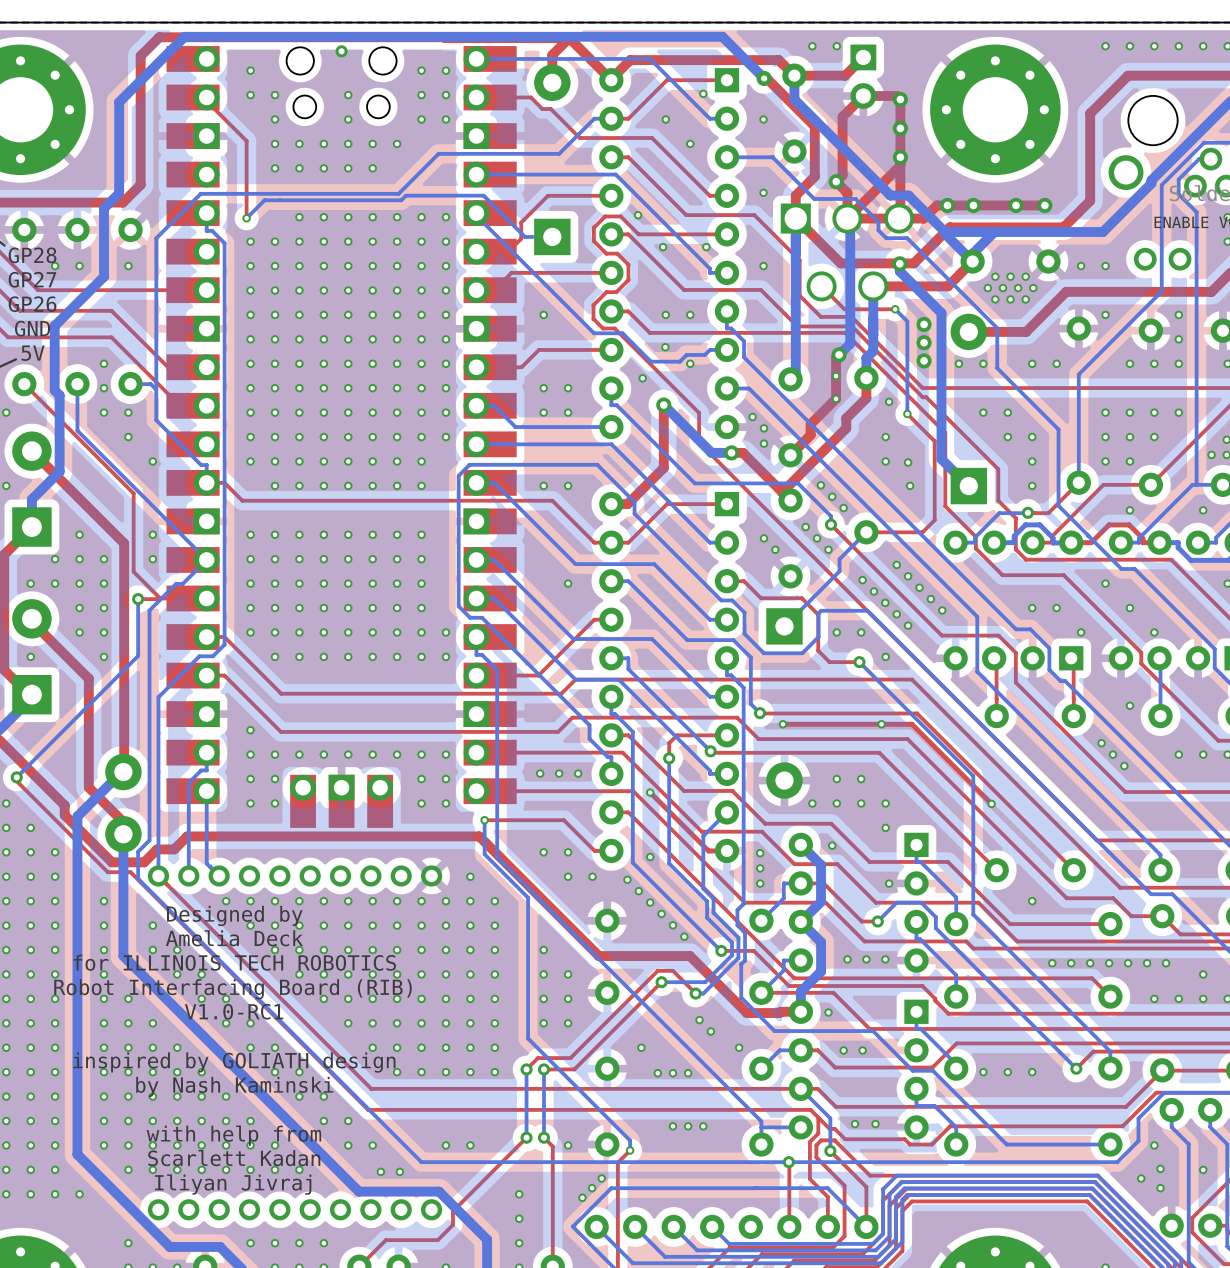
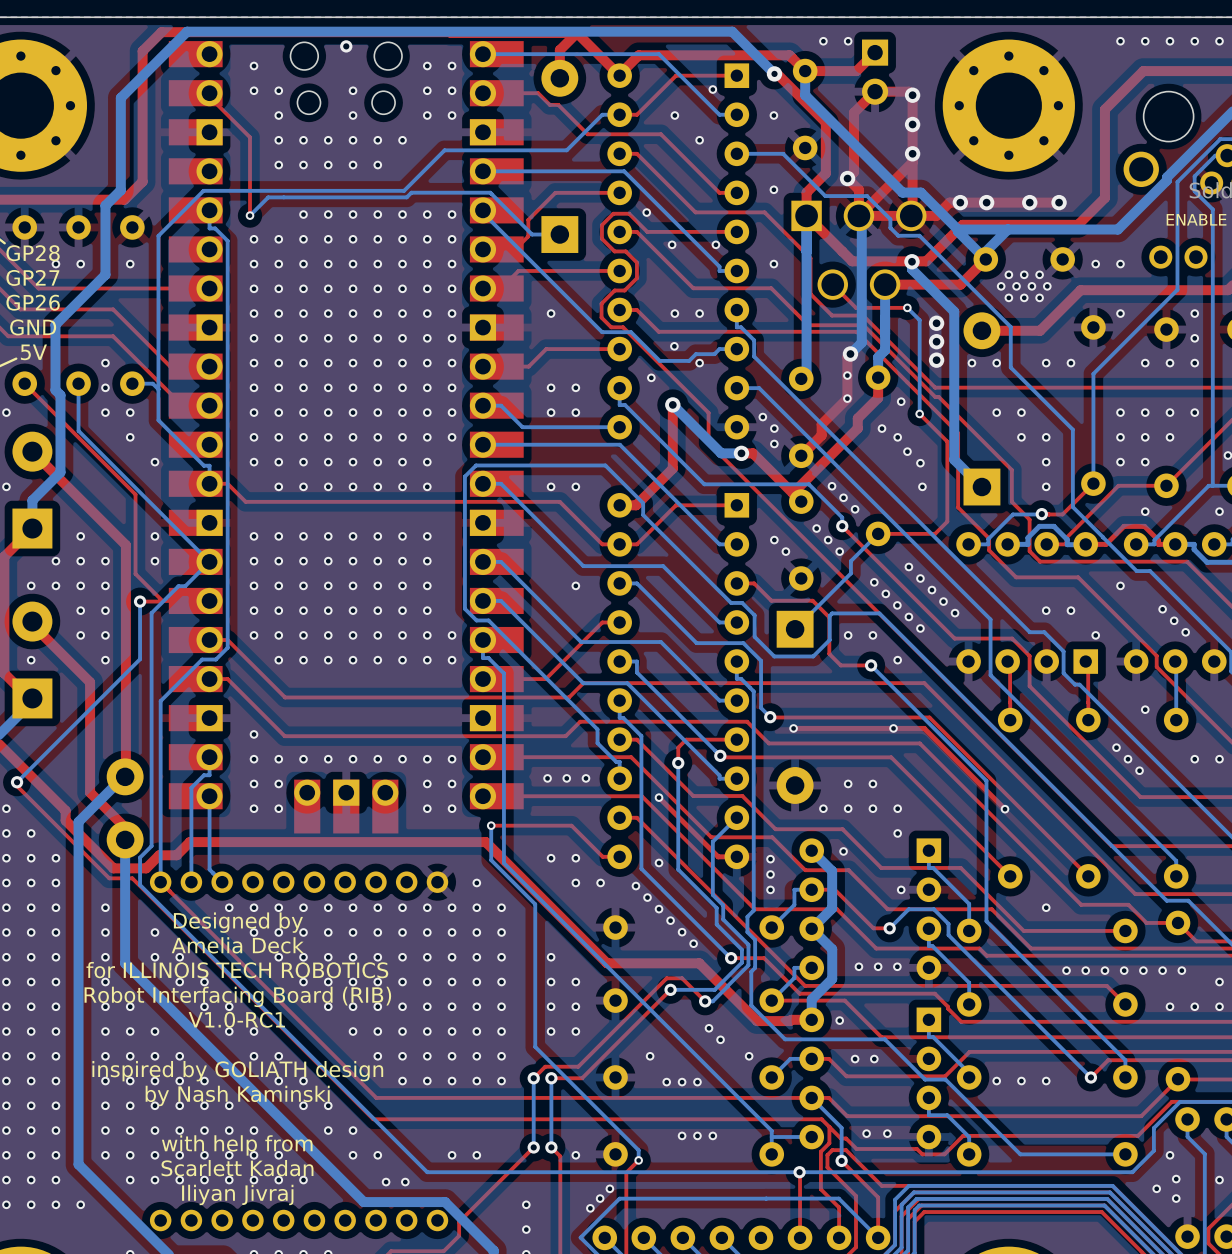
via: none -> (881, 428)
via position: (885, 461) -> (907, 451)
via: none -> (1162, 609)
via: (1129, 608) -> none
via: none -> (1174, 620)
via: none -> (1185, 632)
via: (1154, 632) -> none

